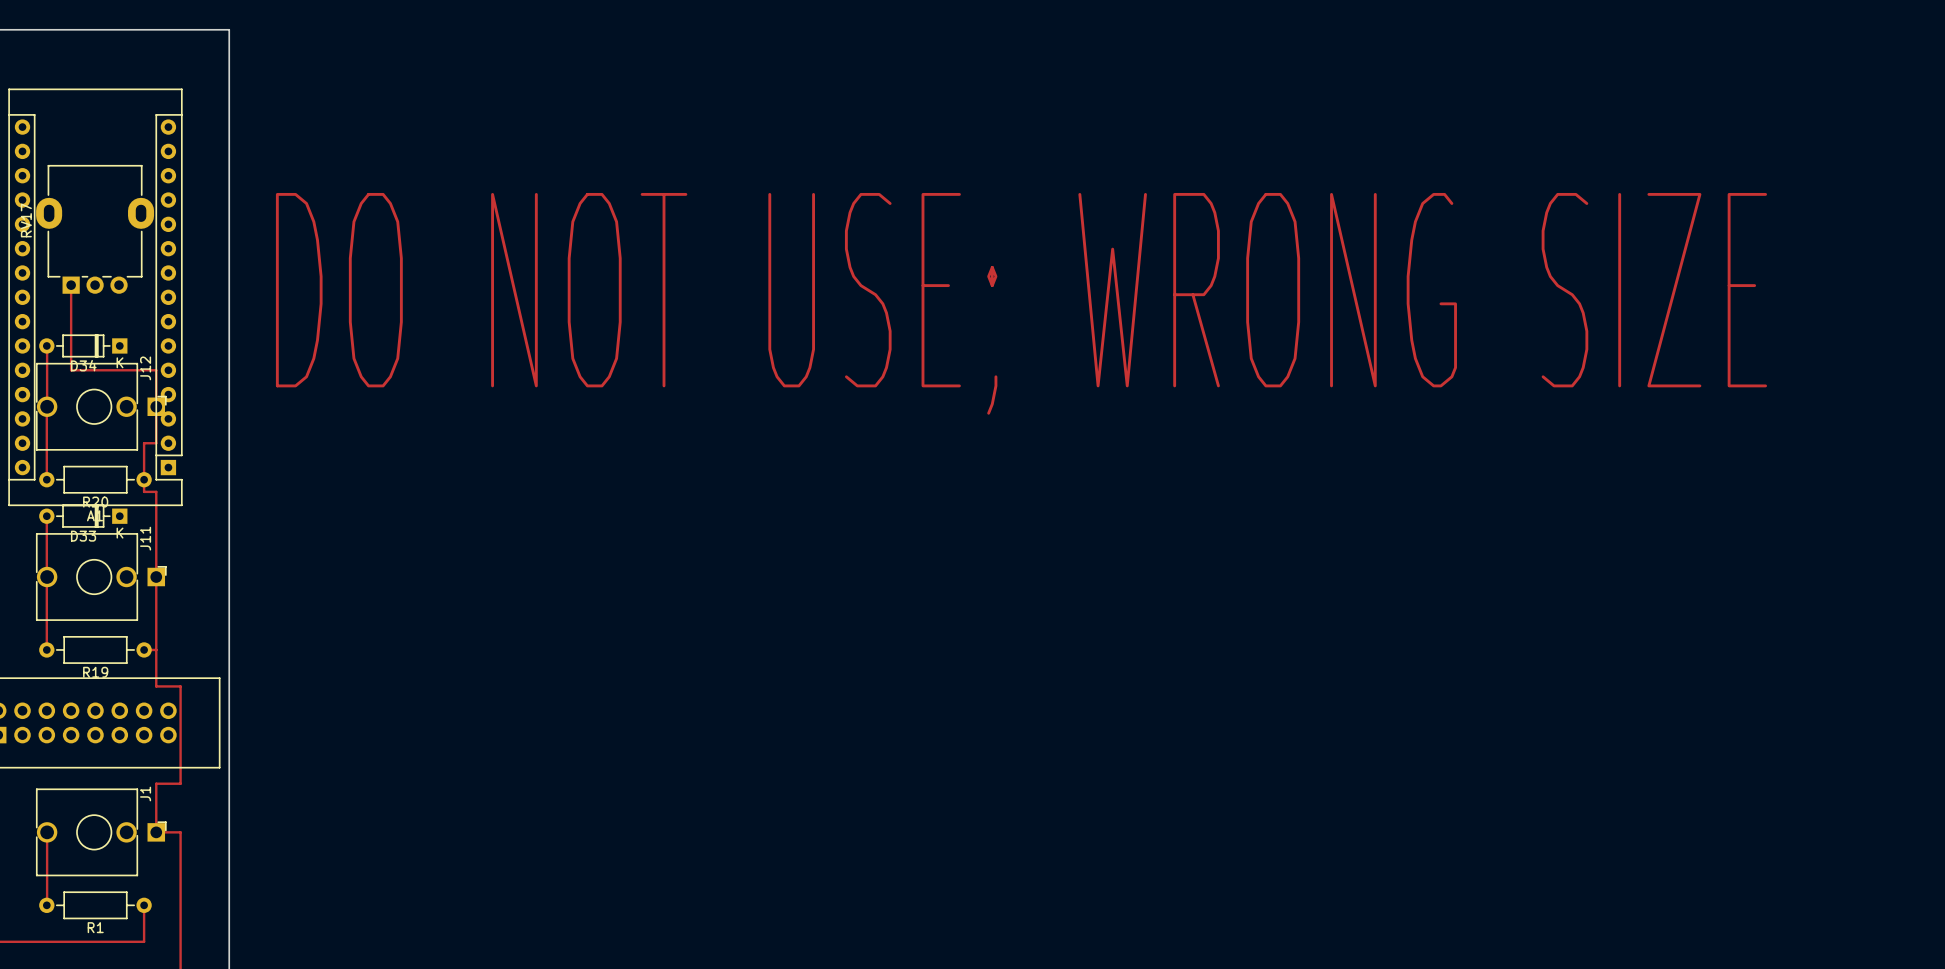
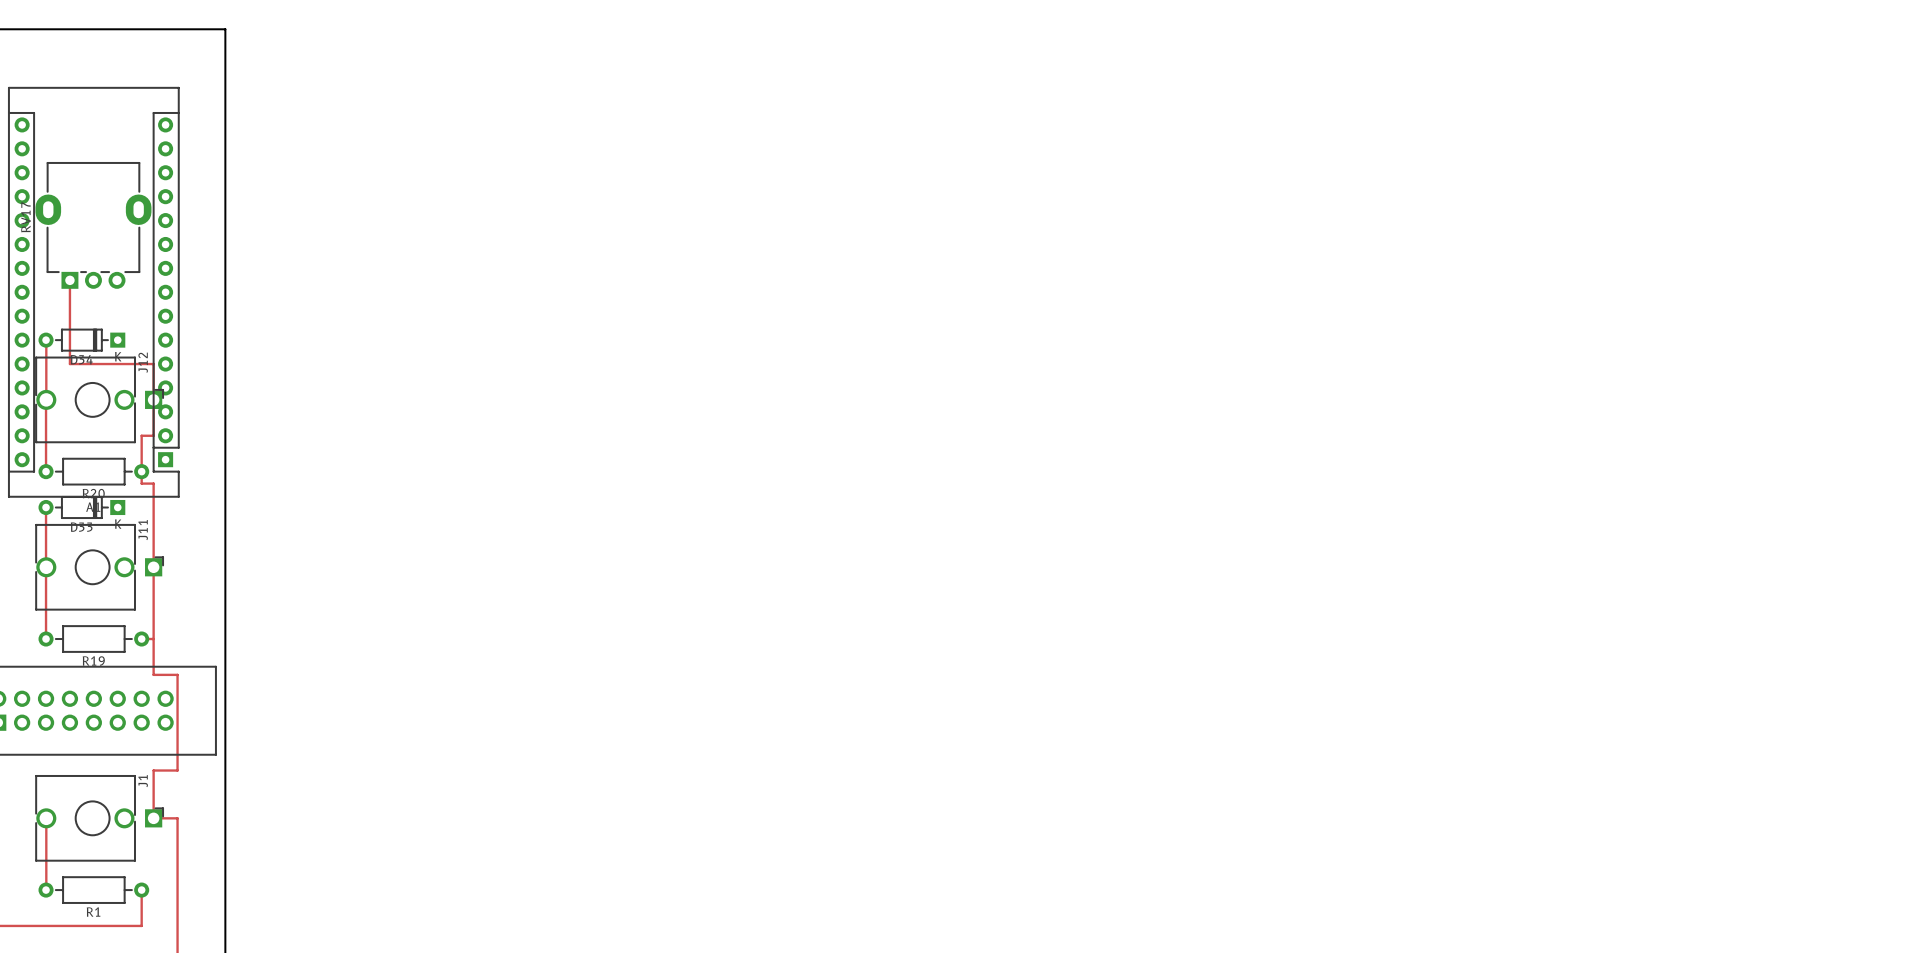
text: DO NOT USE; WRONG SIZE (1021, 303) -> none

